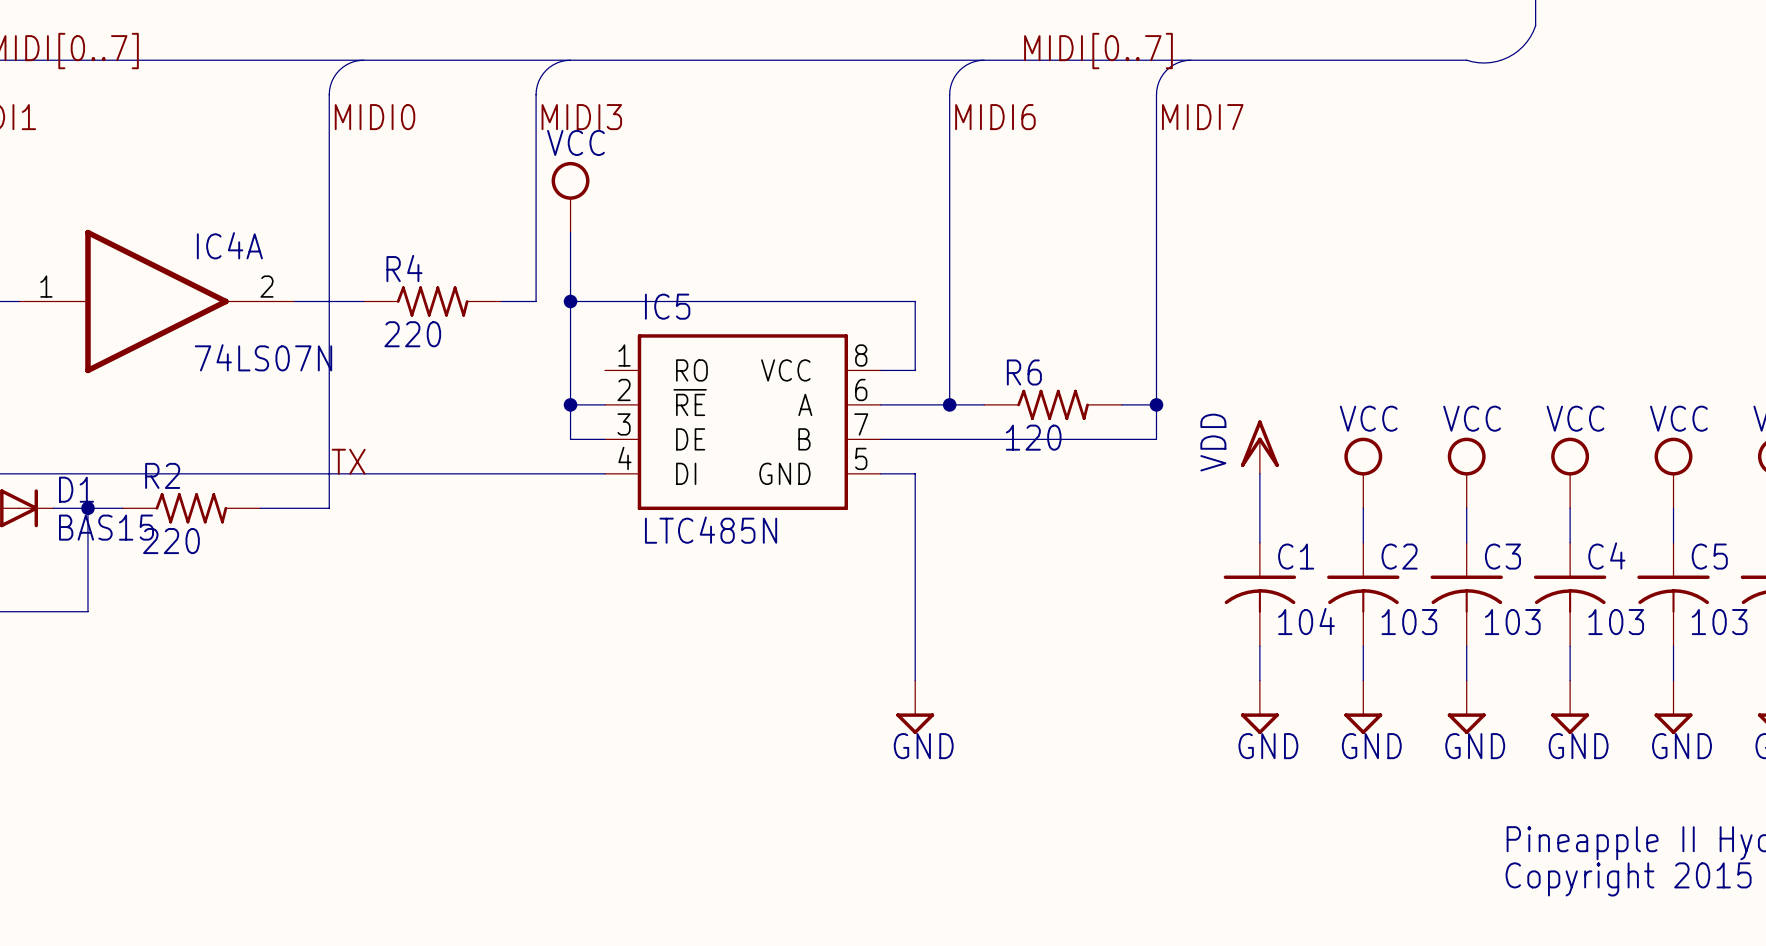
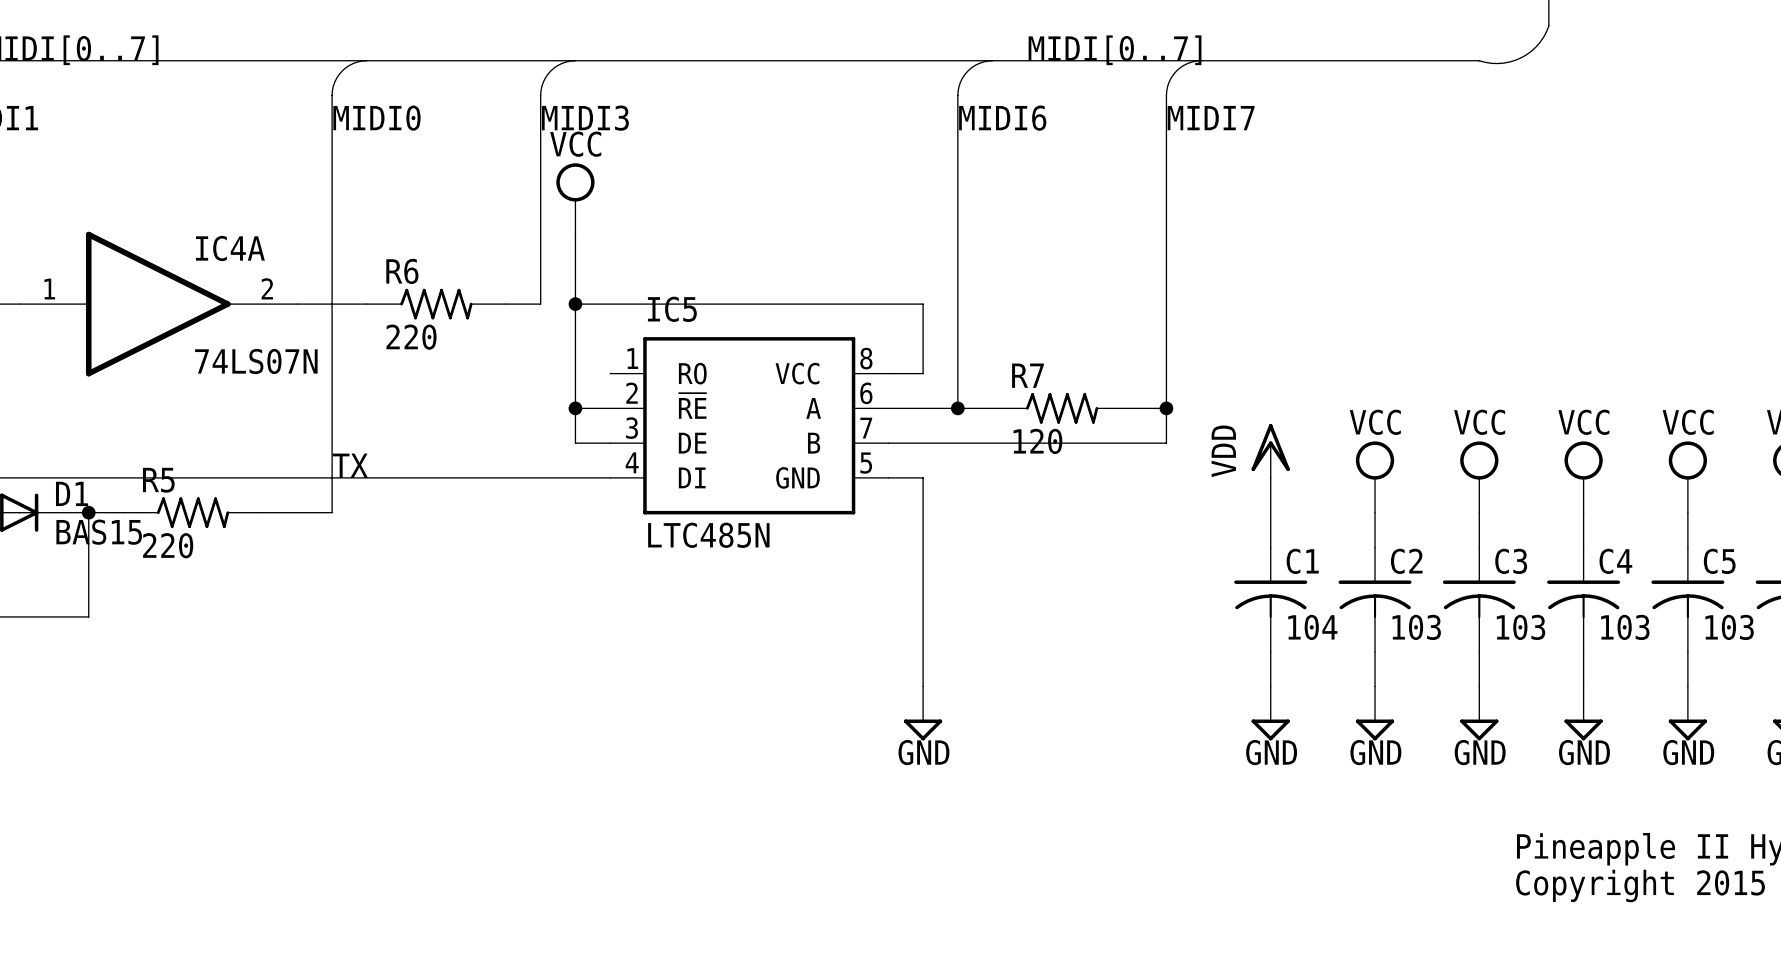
R4 name: R4 (404, 268) -> R6 (402, 271)
R6 name: R6 (1024, 372) -> R7 (1027, 375)
R2 name: R2 (162, 475) -> R5 (158, 480)

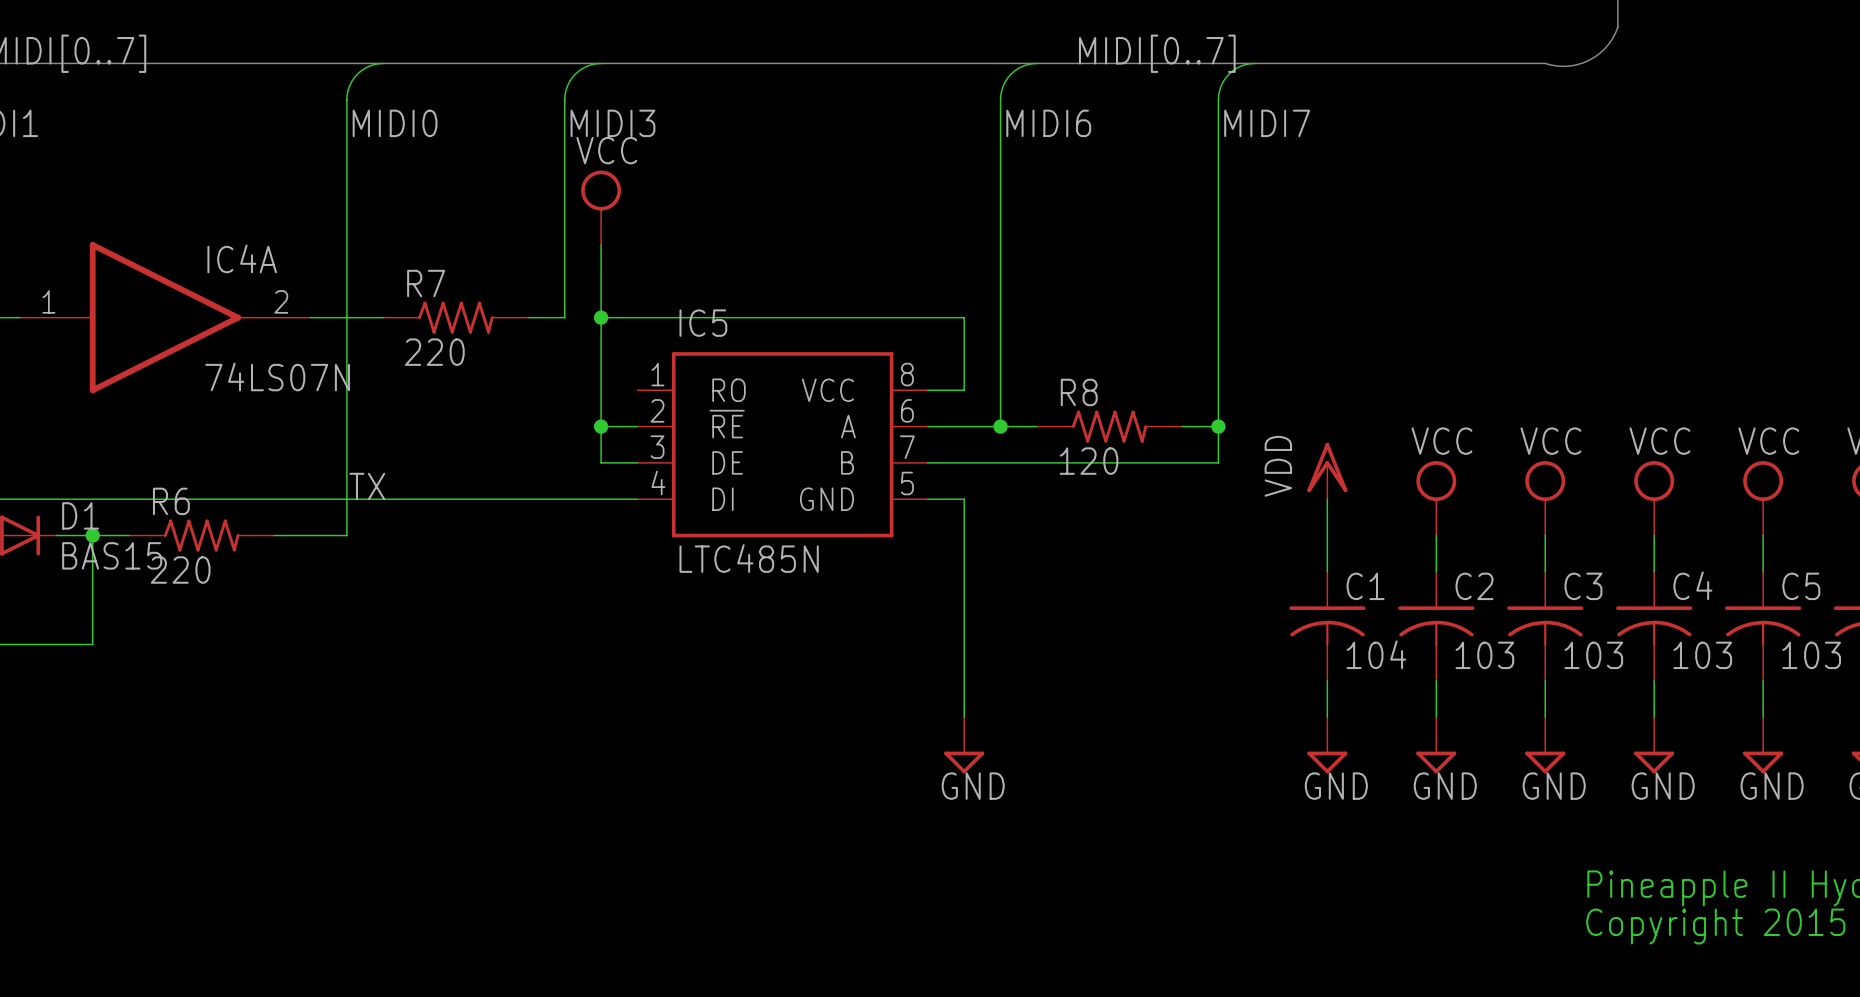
R6 name: R6 (402, 271) -> R7 (426, 283)
R7 name: R7 (1027, 375) -> R8 (1079, 392)
R5 name: R5 (158, 480) -> R6 (171, 501)

